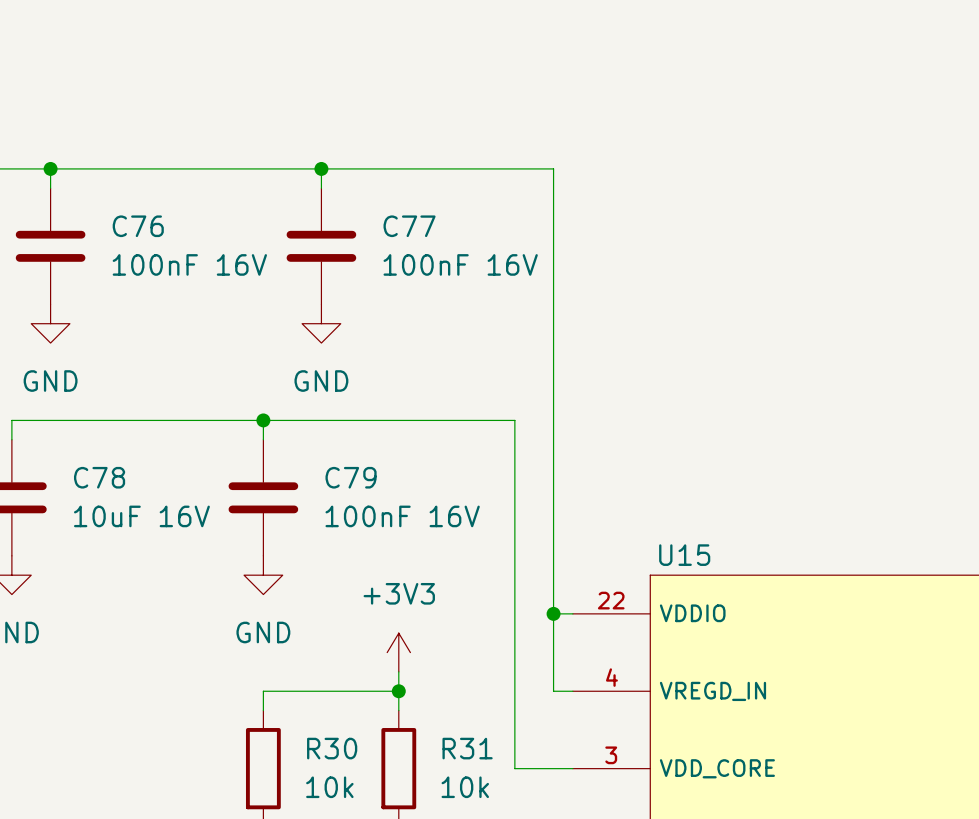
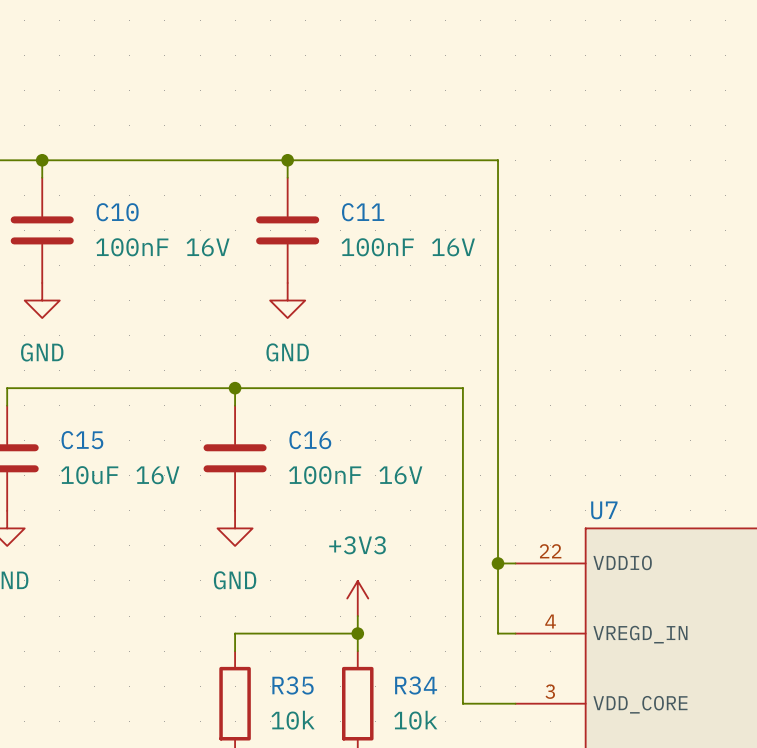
C76 name: C76 (138, 226) -> C10 (117, 212)
C77 name: C77 (409, 226) -> C11 (363, 212)
C78 name: C78 (99, 477) -> C15 (82, 440)
C79 name: C79 (351, 477) -> C16 (310, 440)
U15 name: U15 (684, 555) -> U7 (604, 510)
R30 name: R30 (332, 748) -> R35 (293, 685)
R31 name: R31 (467, 748) -> R34 (416, 685)

